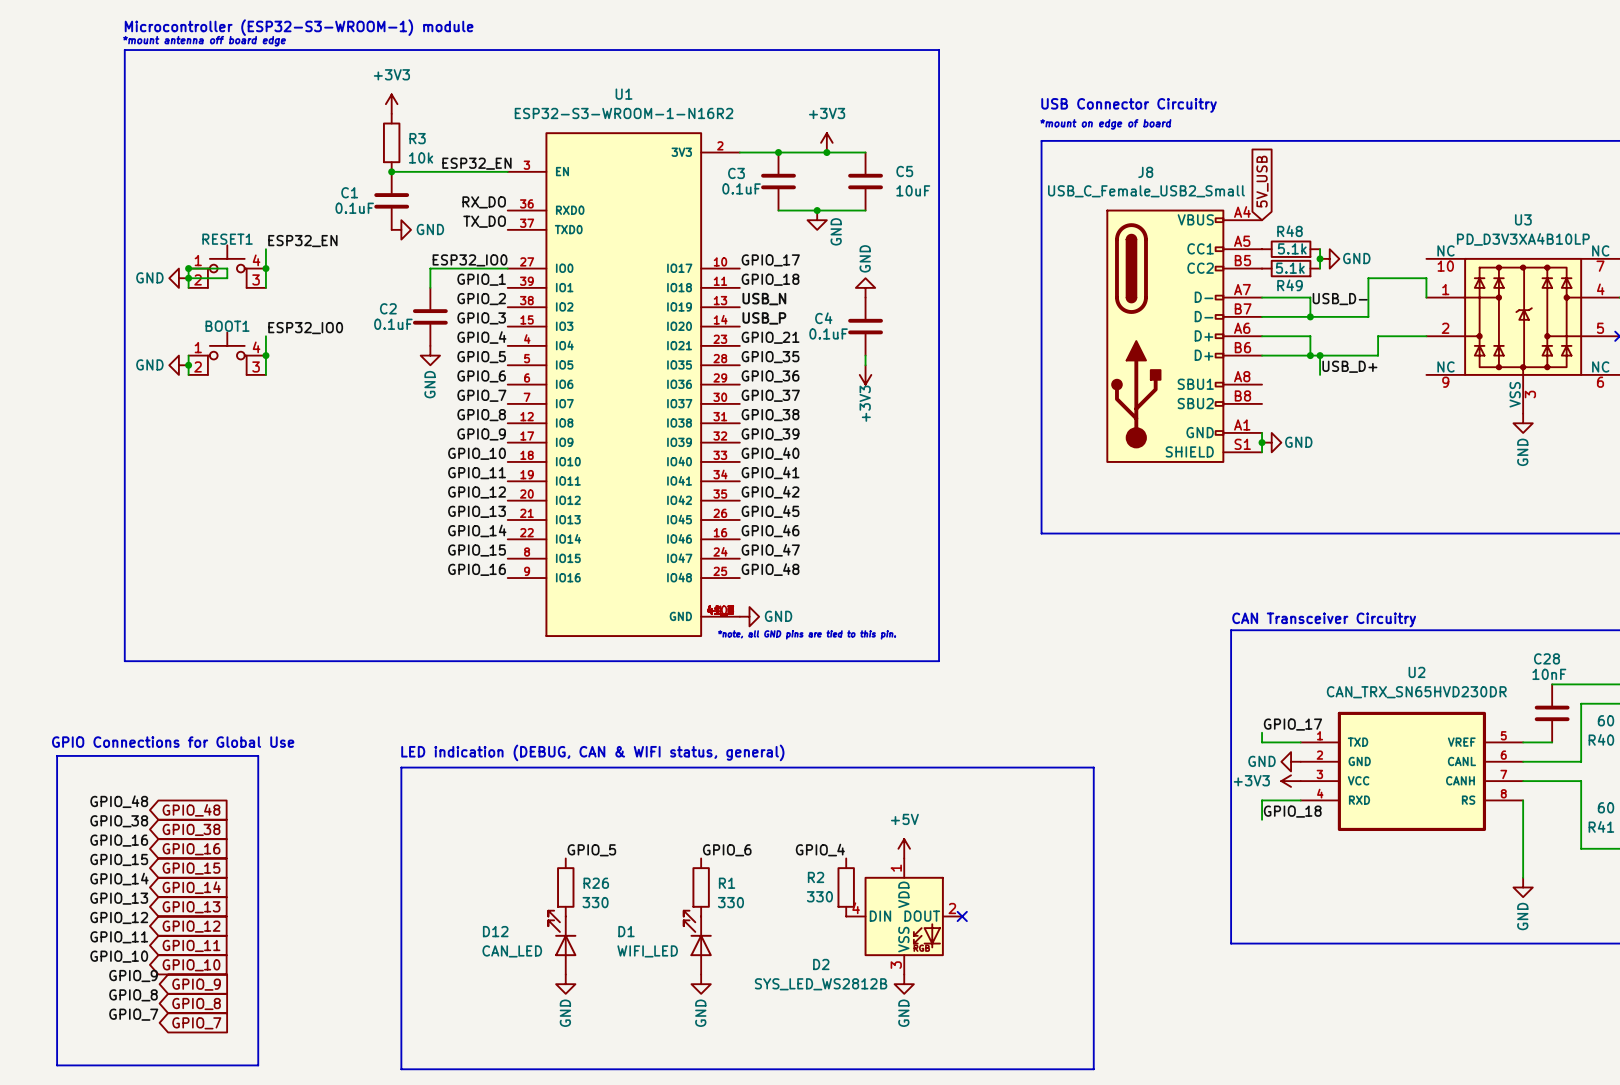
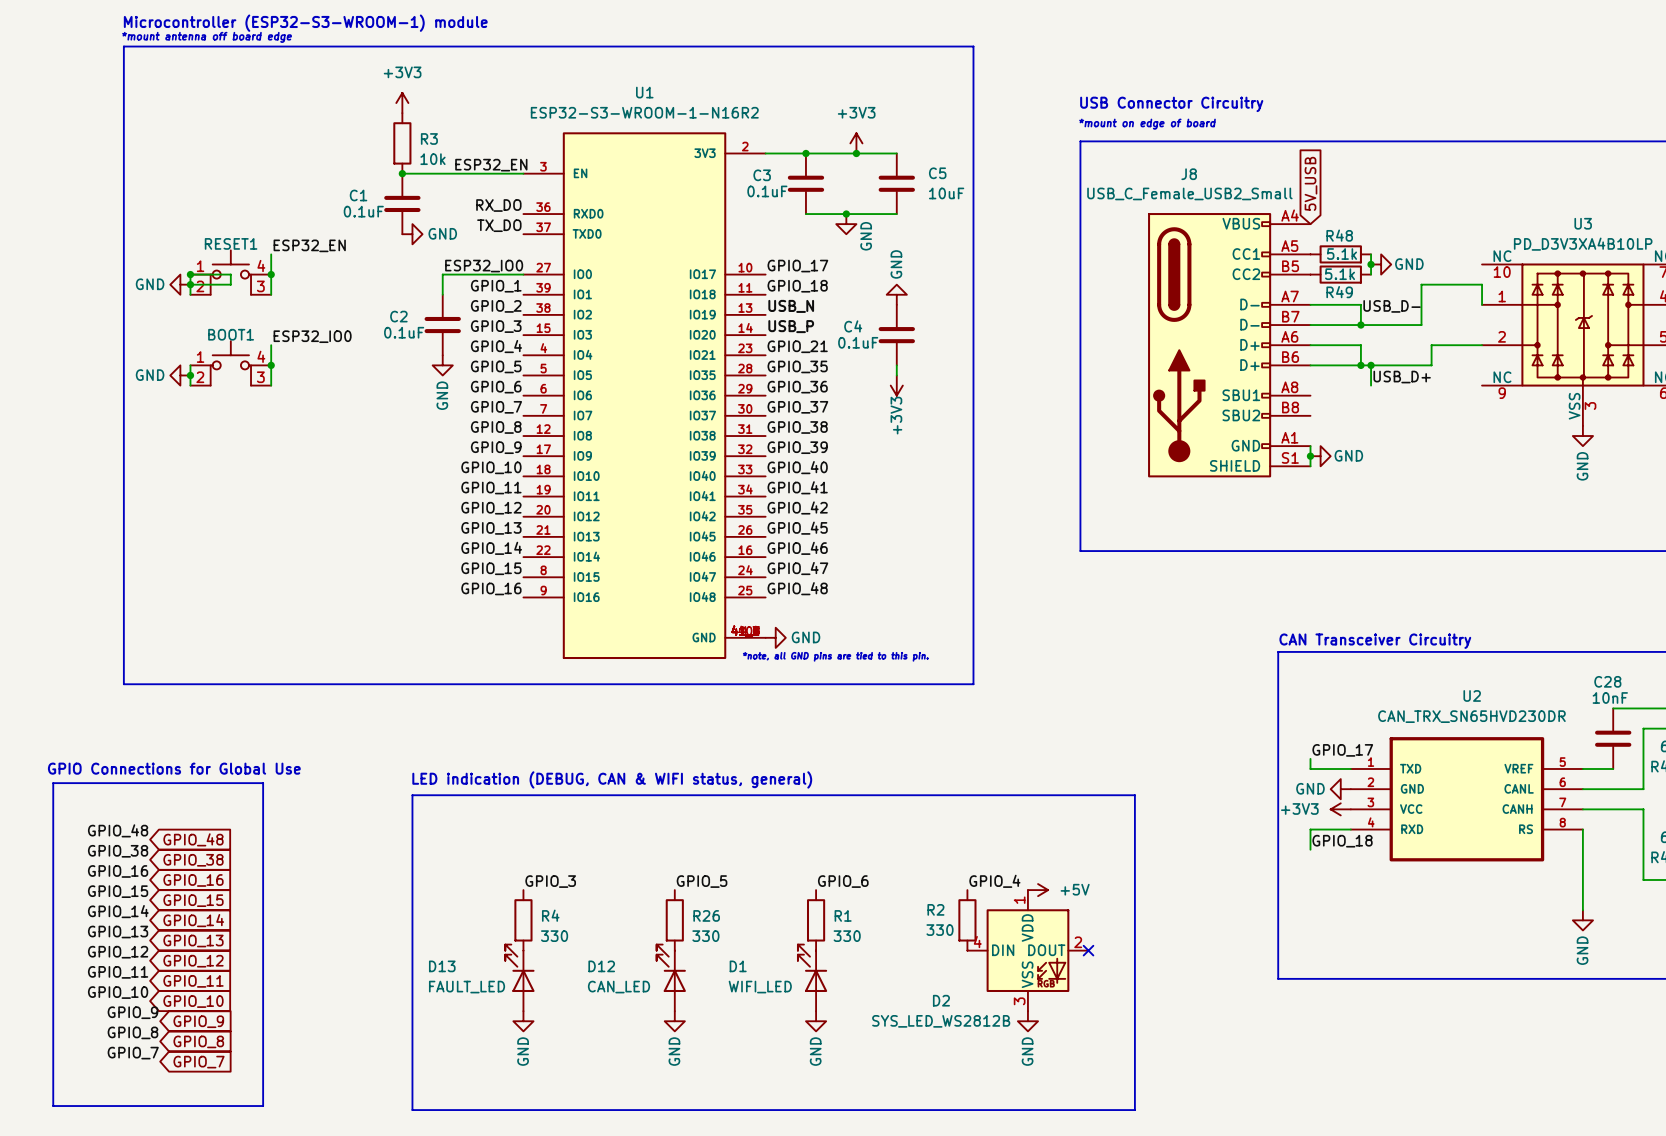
power symbol rotation: 0° (904, 848) -> 90° clockwise (1038, 890)
power symbol position: +5V (904, 848) -> +5V (1038, 890)
label: none -> GPIO_3 (550, 881)
label position: GPIO_5 (591, 850) -> GPIO_5 (702, 881)
label position: GPIO_6 (727, 850) -> GPIO_6 (843, 881)
label position: GPIO_4 (820, 850) -> GPIO_4 (994, 881)
R4: none -> 330 (523, 920)
R26 position: (565, 887) -> (674, 920)
R1 position: (701, 887) -> (816, 920)
R2 position: (846, 887) -> (967, 920)
D2 position: (904, 916) -> (1027, 950)
no-connect mark: (962, 916) -> none
no-connect mark: none -> (1088, 950)
D13: none -> FAULT_LED (519, 977)
D12 position: (562, 942) -> (671, 977)
D1 position: (697, 942) -> (812, 977)
power symbol: none -> GND (523, 1021)
power symbol: GND (565, 984) -> none
power symbol: none -> GND (674, 1021)
power symbol: GND (701, 984) -> none
power symbol: none -> GND (816, 1021)
power symbol: GND (904, 984) -> none
power symbol: none -> GND (1027, 1021)

